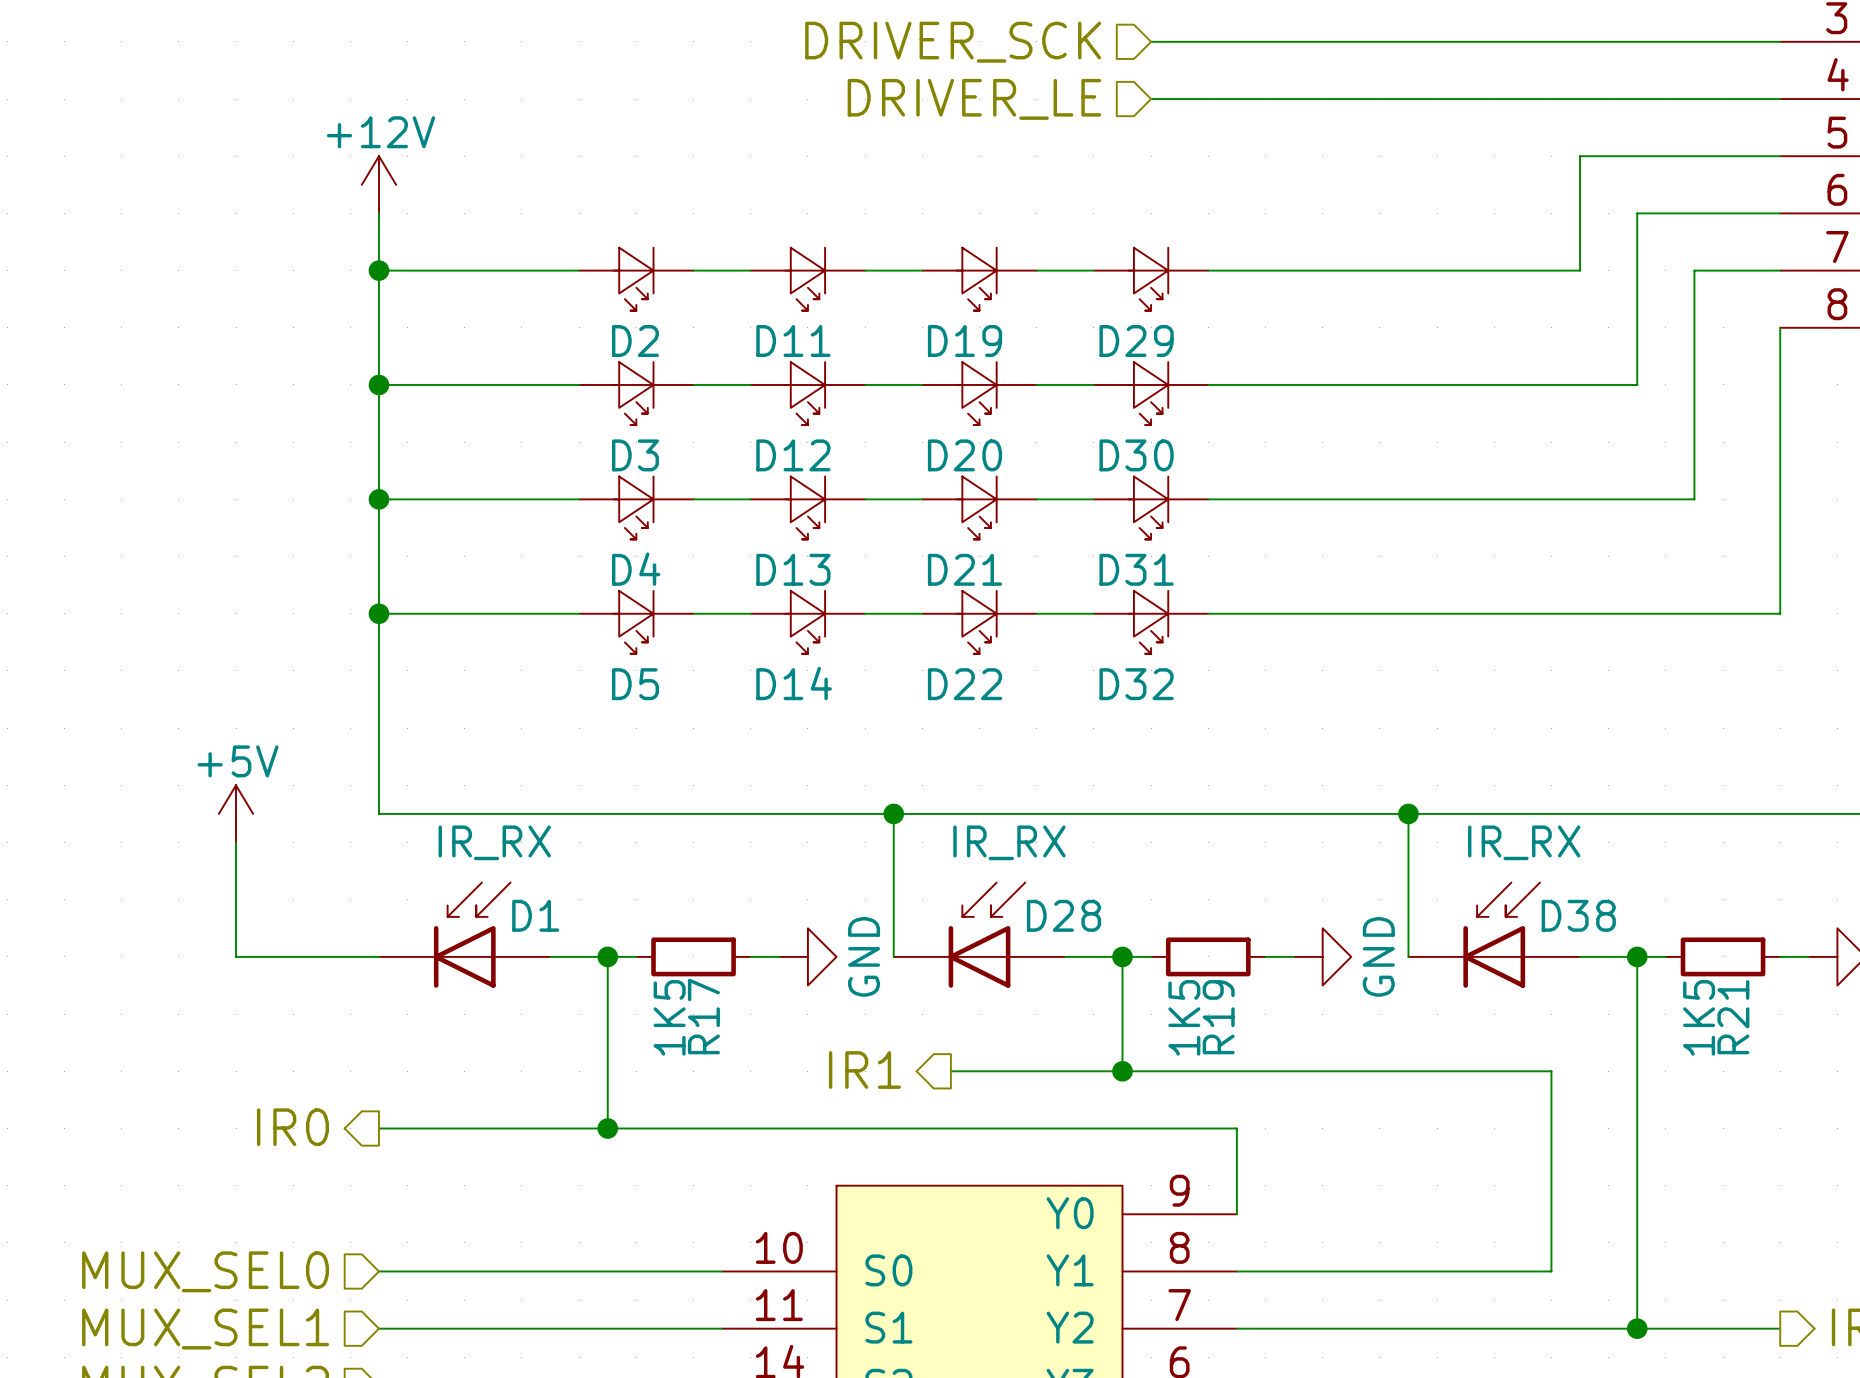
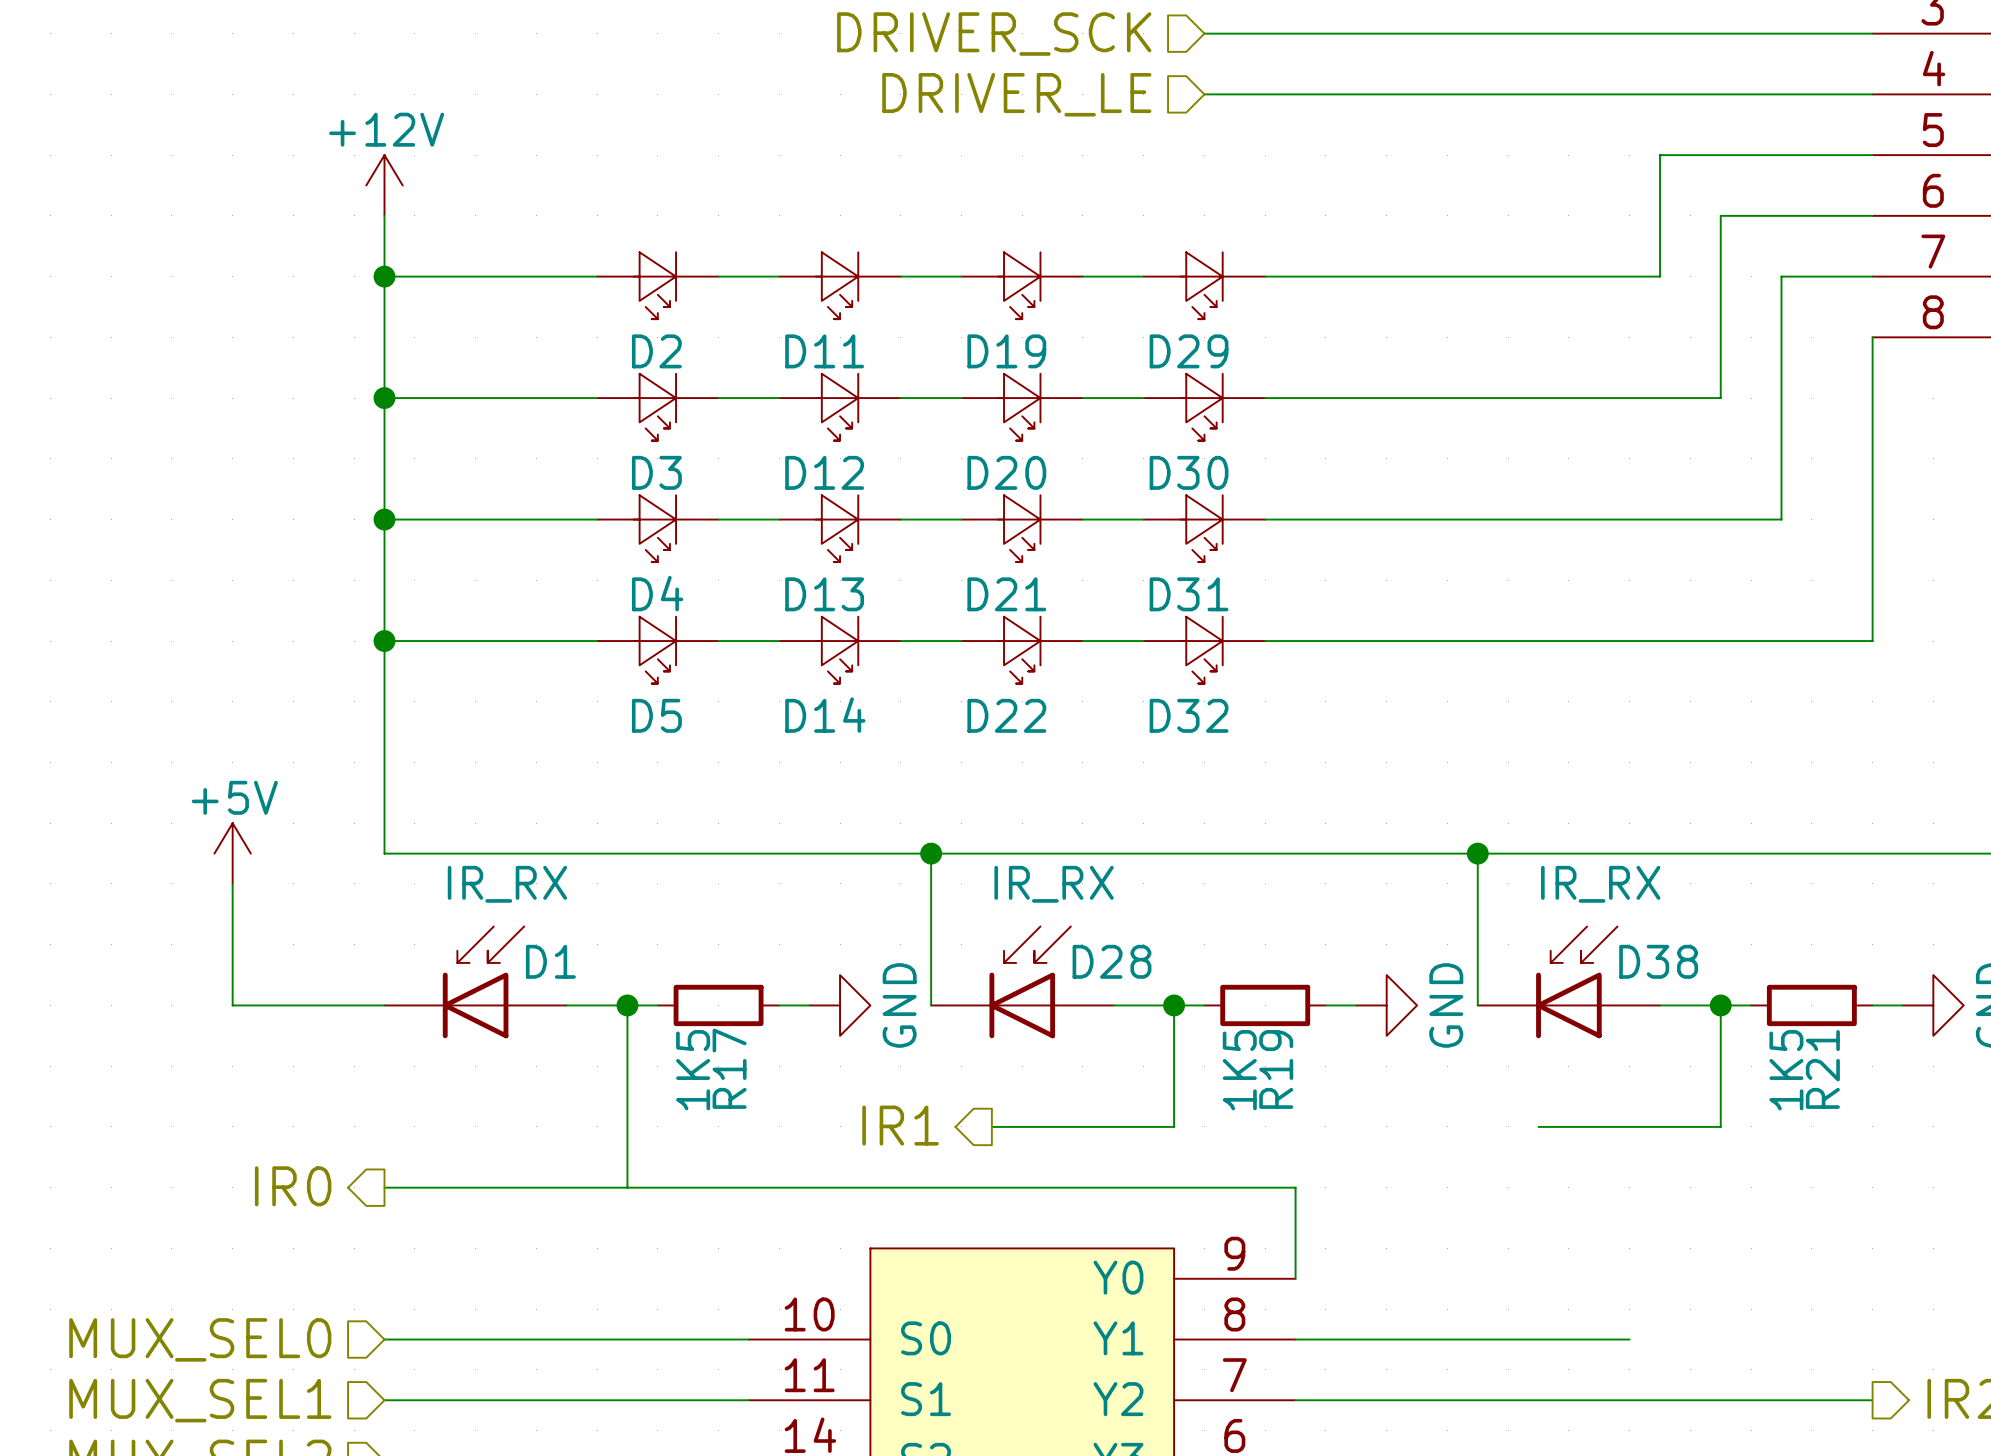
wire: (1122, 1071) (1465, 1071) -> none
junction: (1122, 1071) -> none
wire: (1551, 1071) (1551, 1271) -> (1629, 1126) (1720, 1126)
wire: (1637, 1071) (1637, 1328) -> none
junction: (607, 1128) -> none
junction: (1637, 1328) -> none

